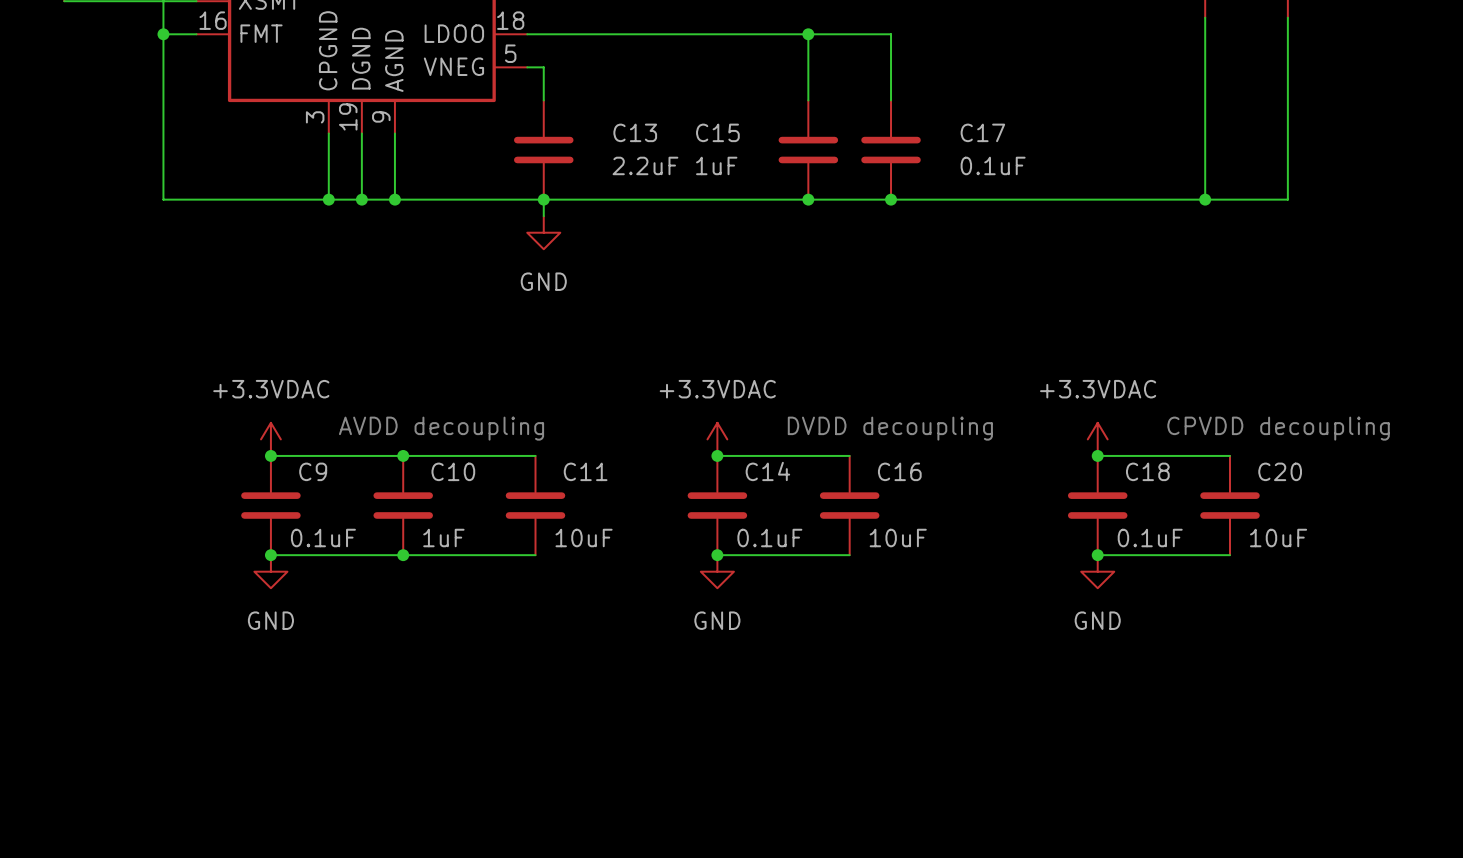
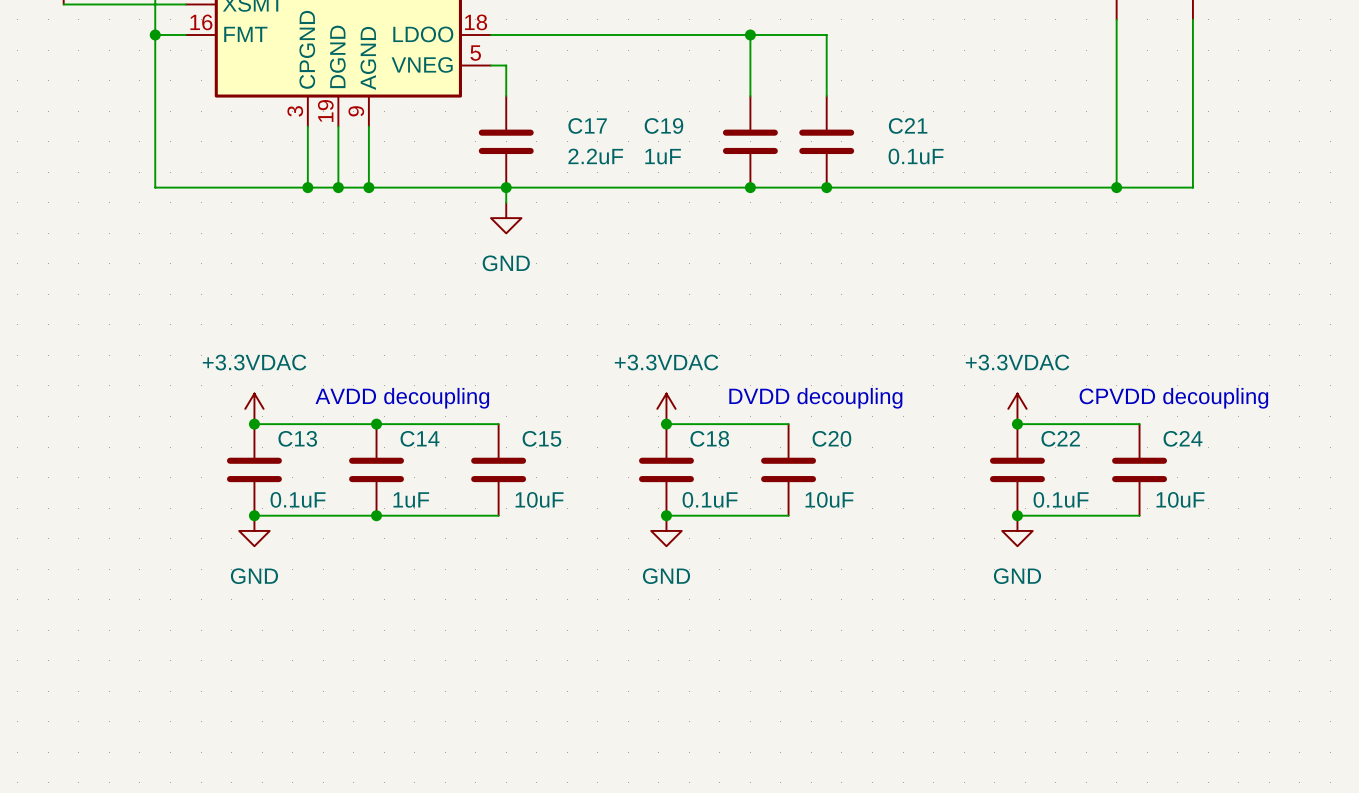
C13 name: C13 (635, 132) -> C17 (587, 125)
C15 name: C15 (717, 132) -> C19 (663, 125)
C17 name: C17 (982, 132) -> C21 (908, 125)
C9 name: C9 (313, 471) -> C13 (297, 438)
C10 name: C10 (453, 471) -> C14 (420, 438)
C11 name: C11 (585, 471) -> C15 (541, 438)
C14 name: C14 (767, 471) -> C18 (709, 438)
C16 name: C16 (899, 471) -> C20 (831, 438)
C18 name: C18 (1147, 471) -> C22 (1060, 438)
C20 name: C20 (1280, 471) -> C24 (1183, 438)

